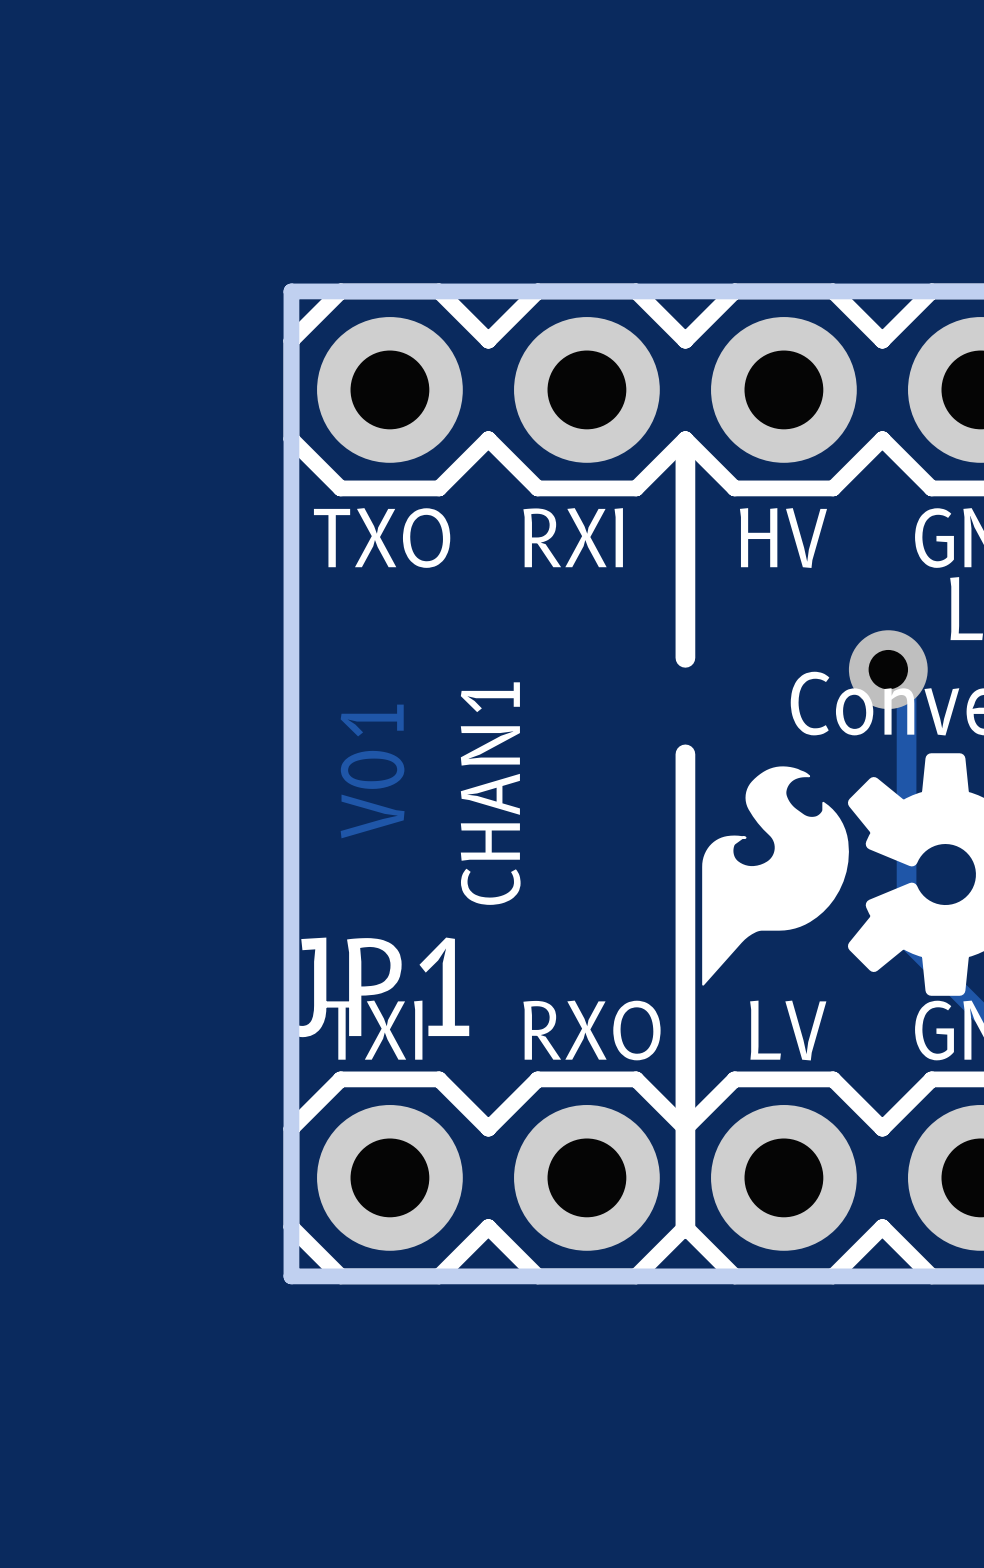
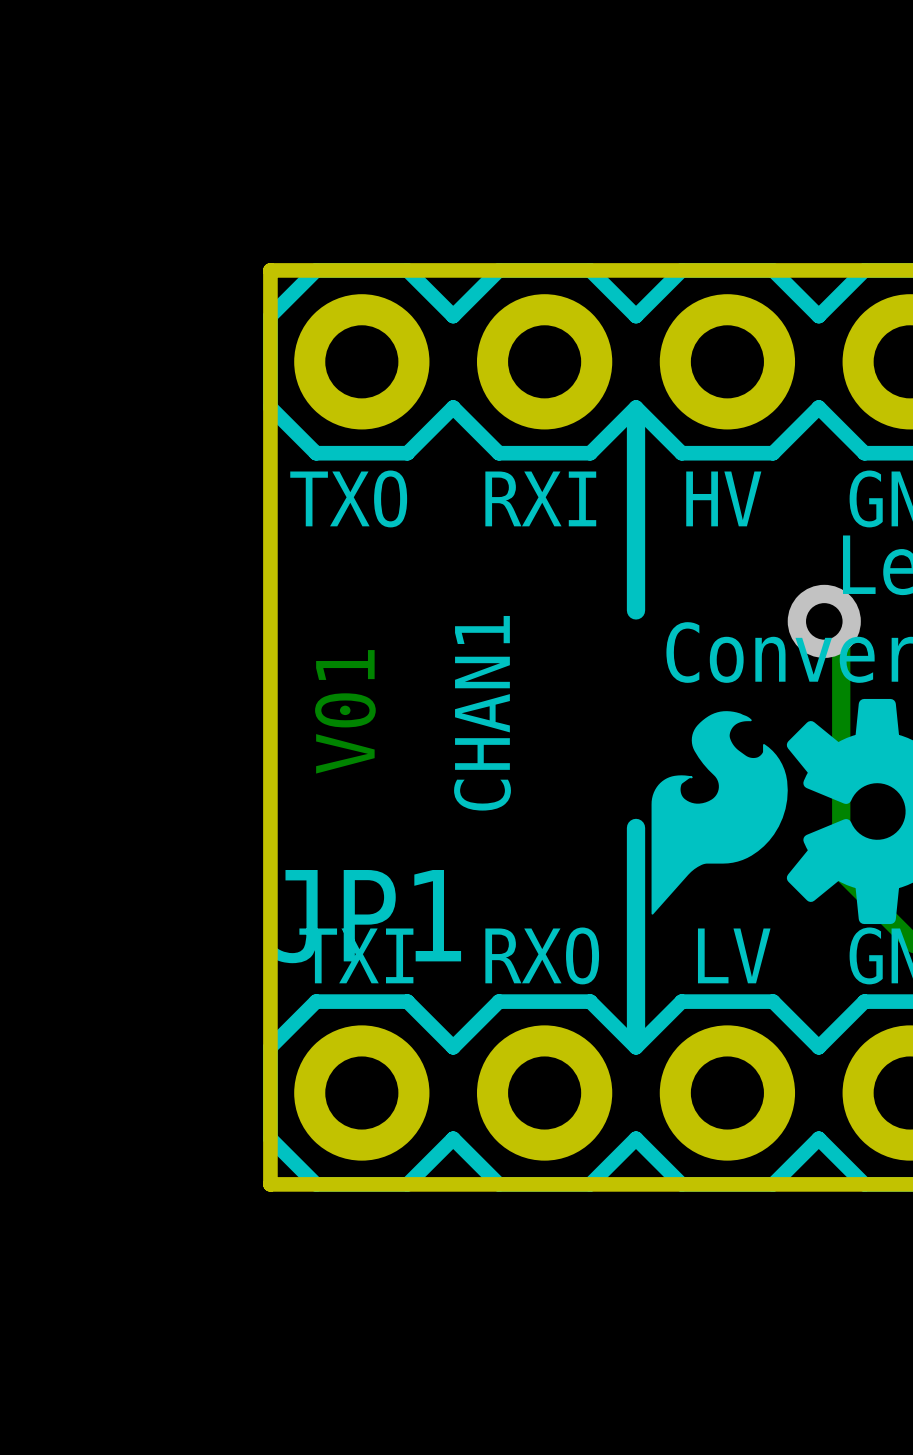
line: (685, 754) (685, 892) -> none
text position: CHAN1 (490, 793) -> CHAN1 (482, 713)
line: (685, 1120) (685, 1229) -> none

